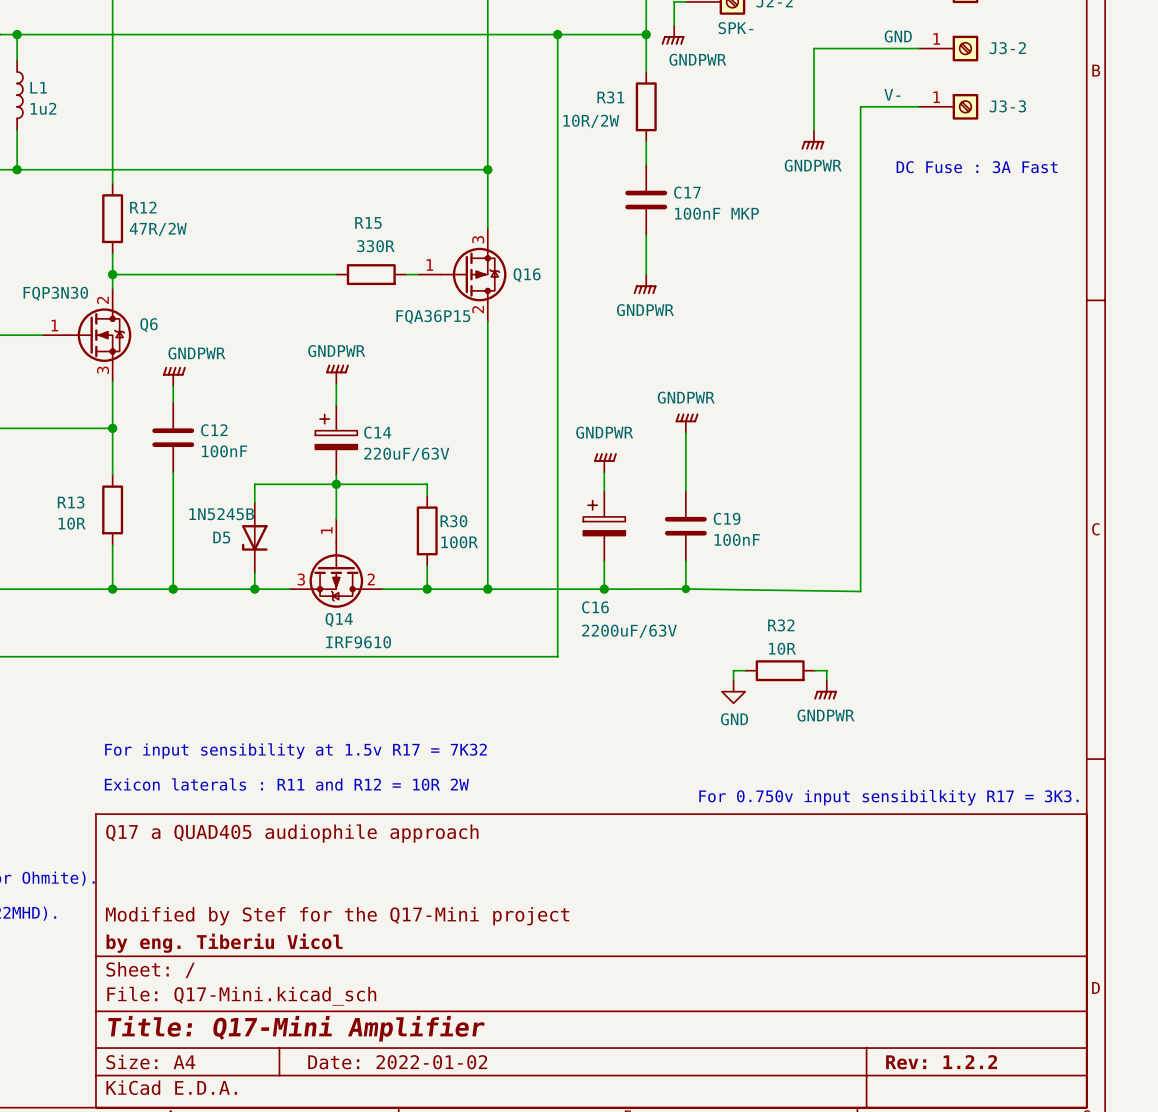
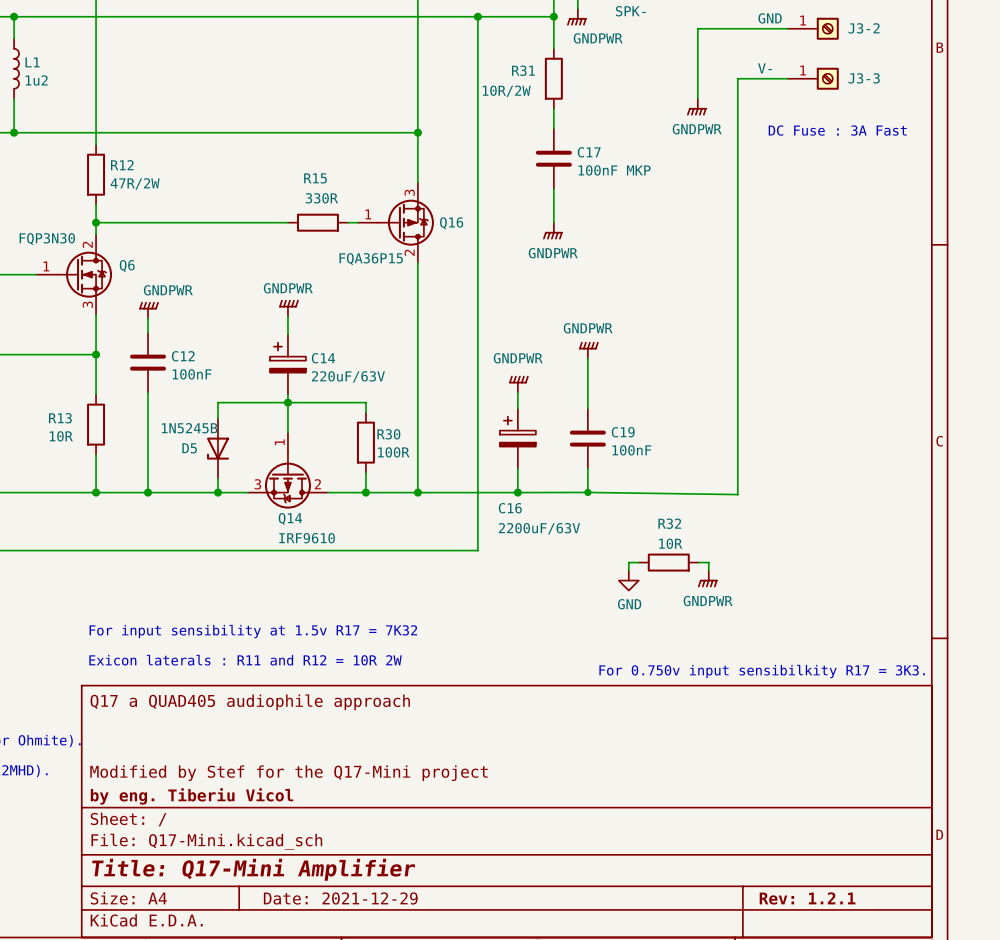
title block: Date: 2022-01-02 (397, 1062) -> Date: 2021-12-29 (340, 898)
title block: Rev: 1.2.2 (941, 1062) -> Rev: 1.2.1 (807, 898)

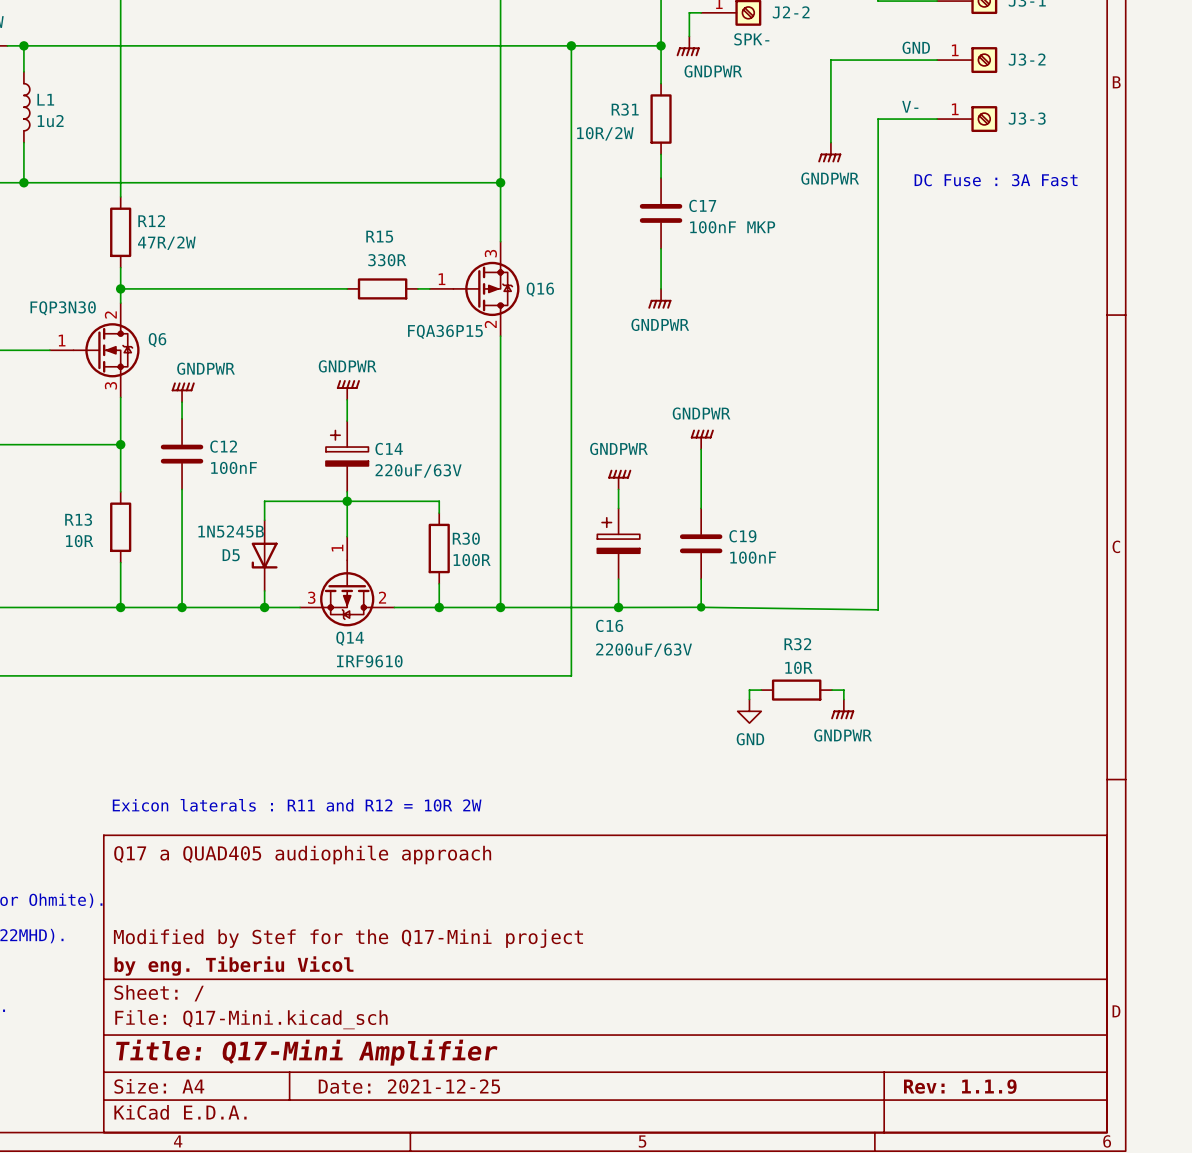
text: For input sensibility at 1.5v R17 = 7K32 (253, 631) -> none
text: For 0.750v input sensibilkity R17 = 3K3. (762, 671) -> none
title block: Date: 2021-12-29 (340, 898) -> Date: 2021-12-25 (409, 1086)
title block: Rev: 1.2.1 (807, 898) -> Rev: 1.1.9 (960, 1086)

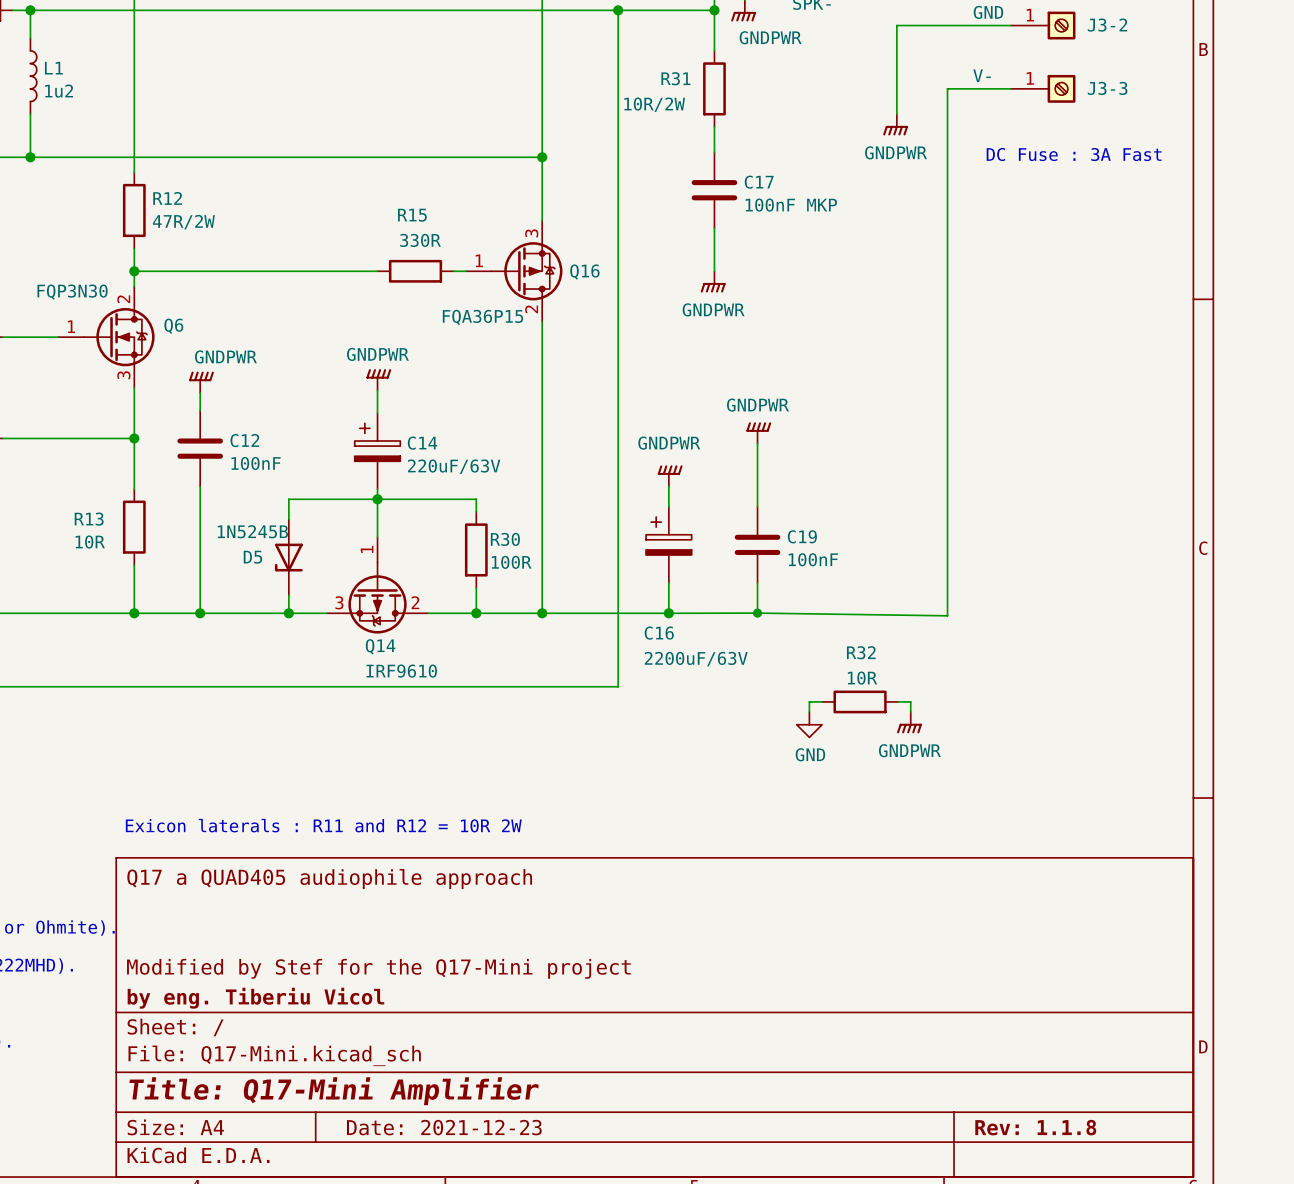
title block: Date: 2021-12-25 (409, 1086) -> Date: 2021-12-23 (444, 1127)
title block: Rev: 1.1.9 (960, 1086) -> Rev: 1.1.8 (1035, 1127)

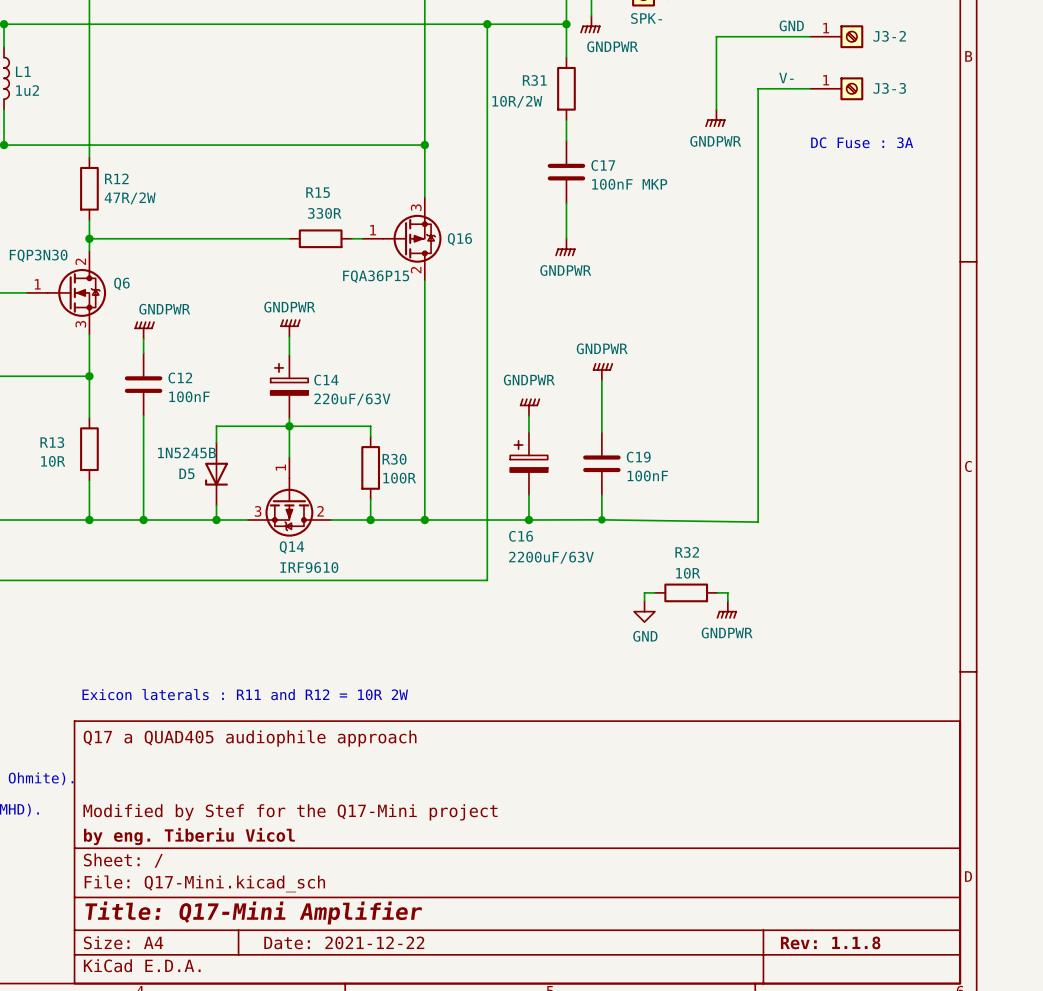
text: DC Fuse : 3A Fast (1074, 154) -> DC Fuse : 3A (862, 142)
title block: Date: 2021-12-23 (444, 1127) -> Date: 2021-12-22 (344, 942)

